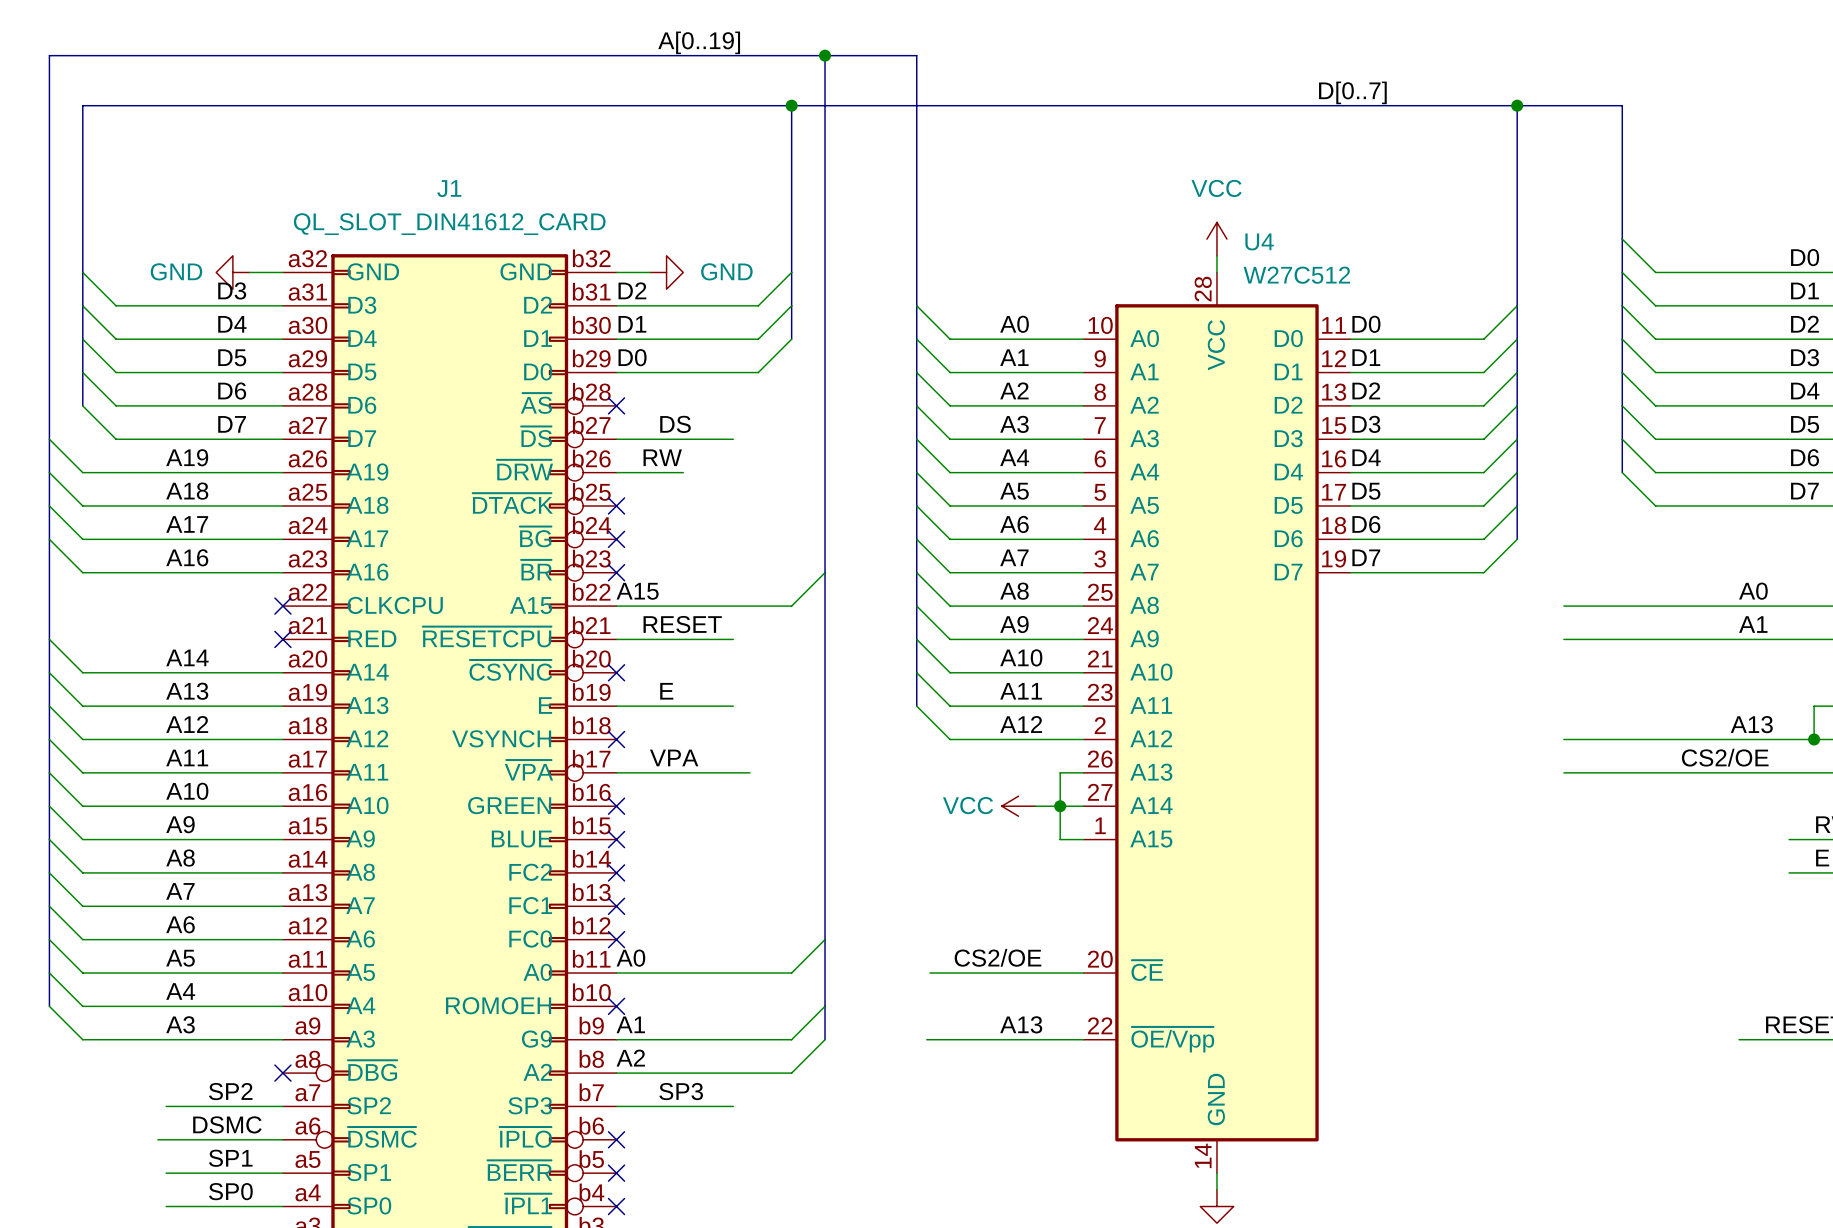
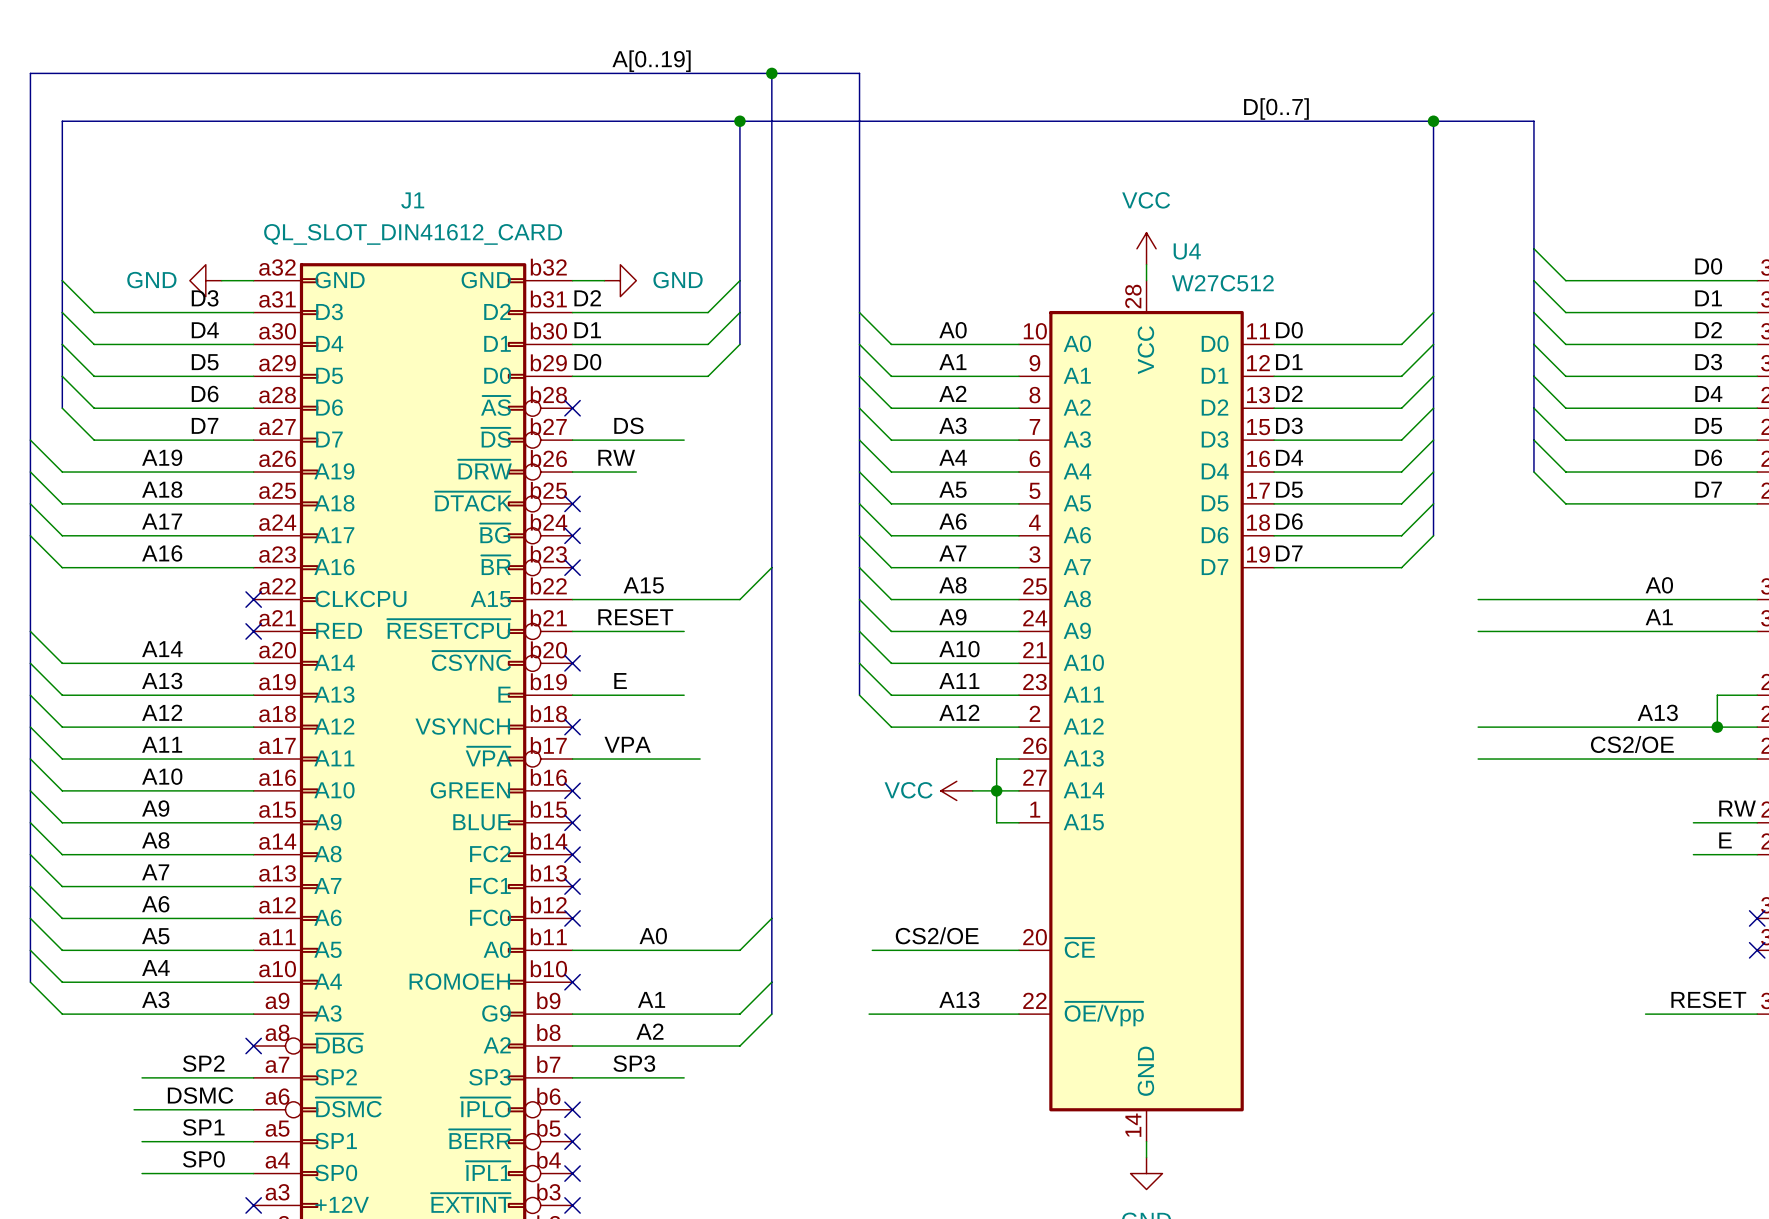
label position: A15 (637, 591) -> A15 (643, 585)
label position: A0 (630, 958) -> A0 (653, 936)
label position: A1 (630, 1024) -> A1 (651, 999)
label position: A2 (630, 1058) -> A2 (649, 1031)

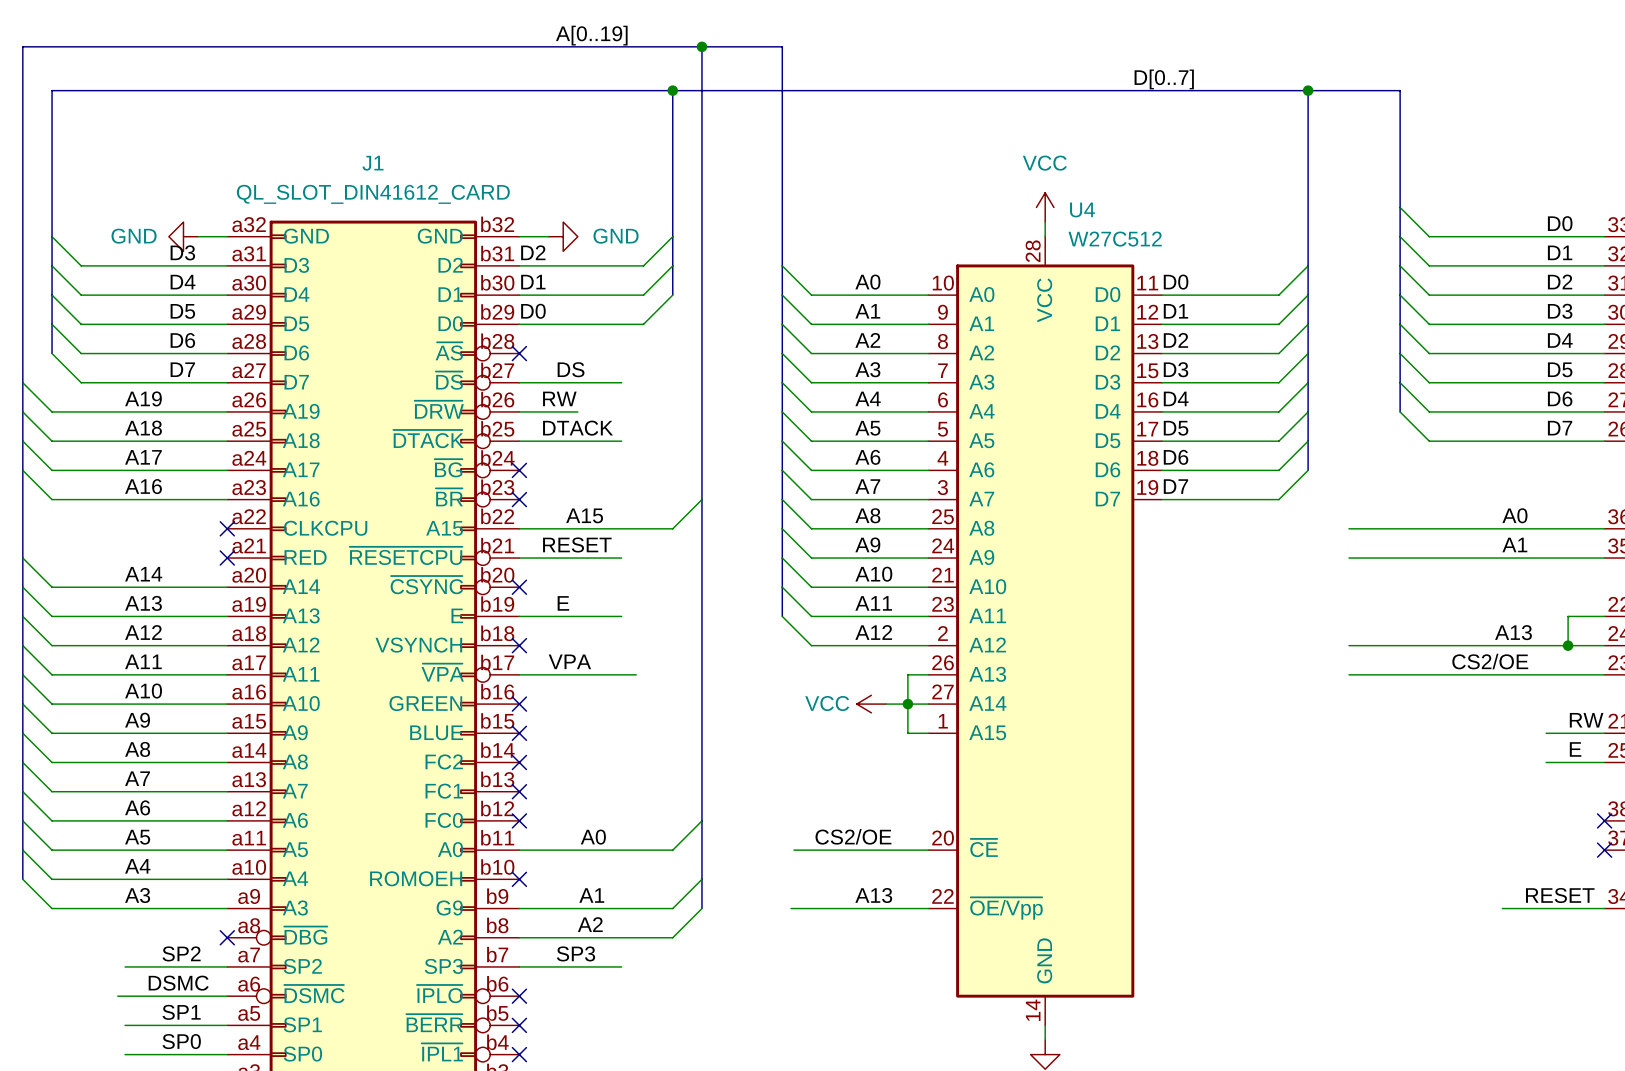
label: none -> DTACK (578, 428)
wire: none -> (519, 441) (621, 441)
no-connect mark: (572, 503) -> none

